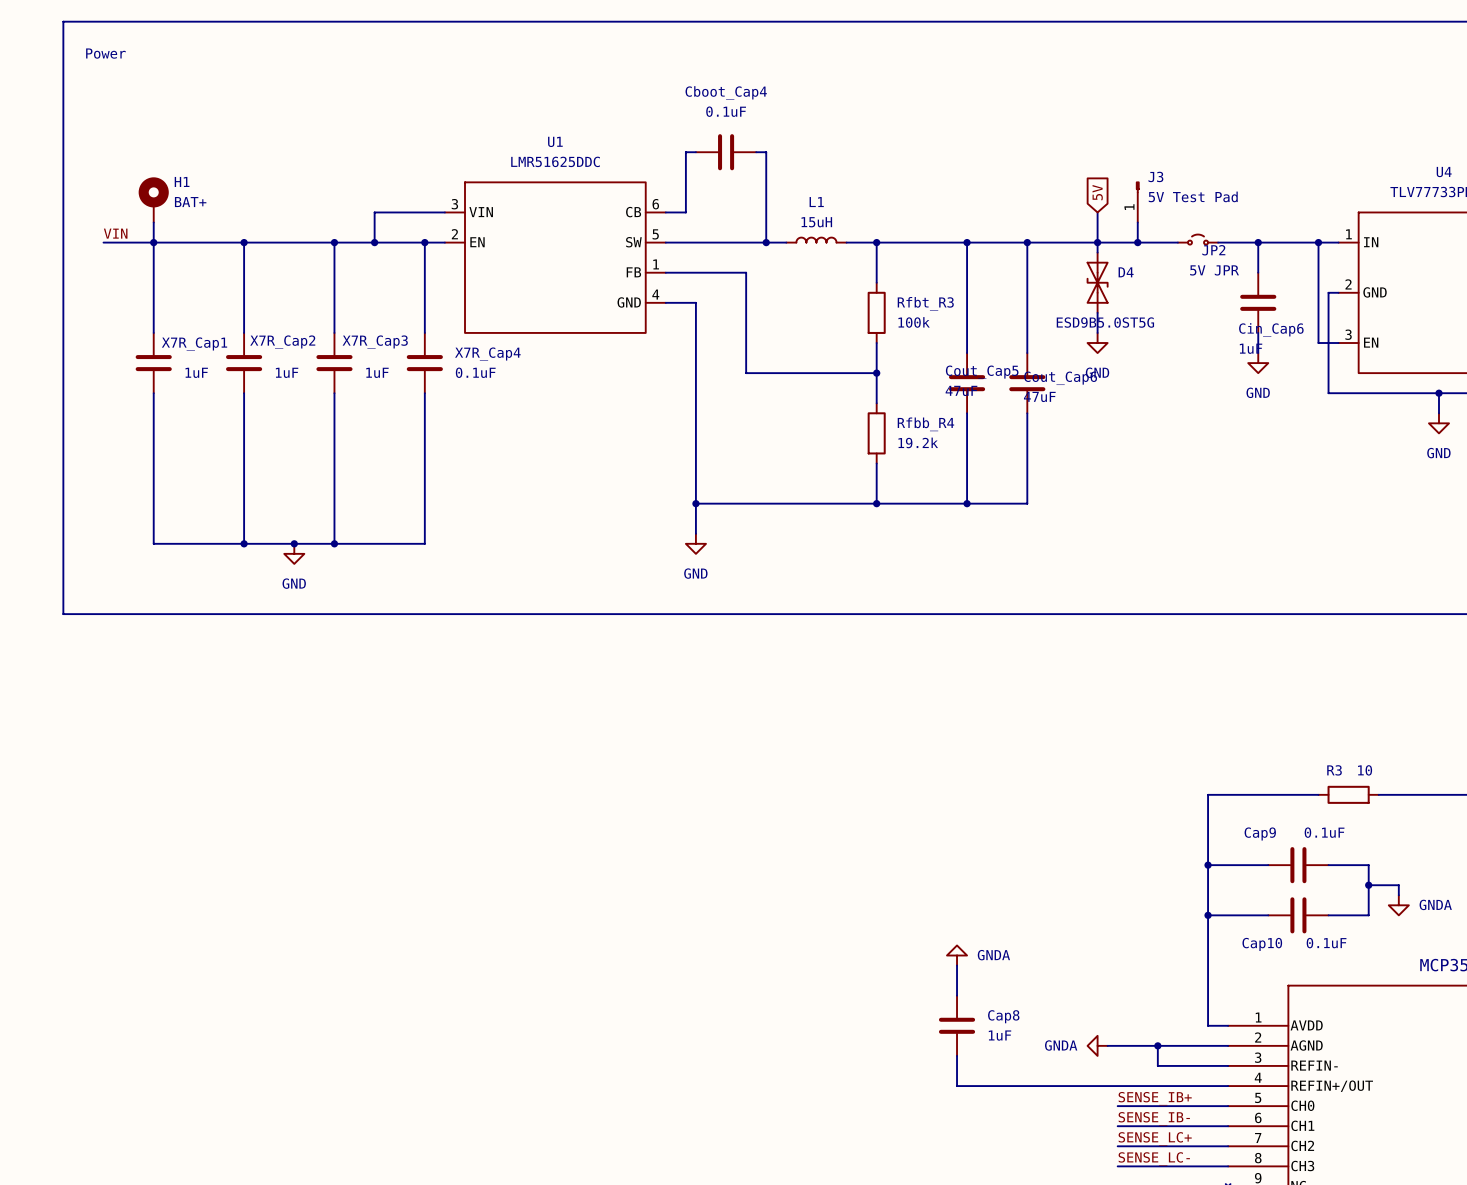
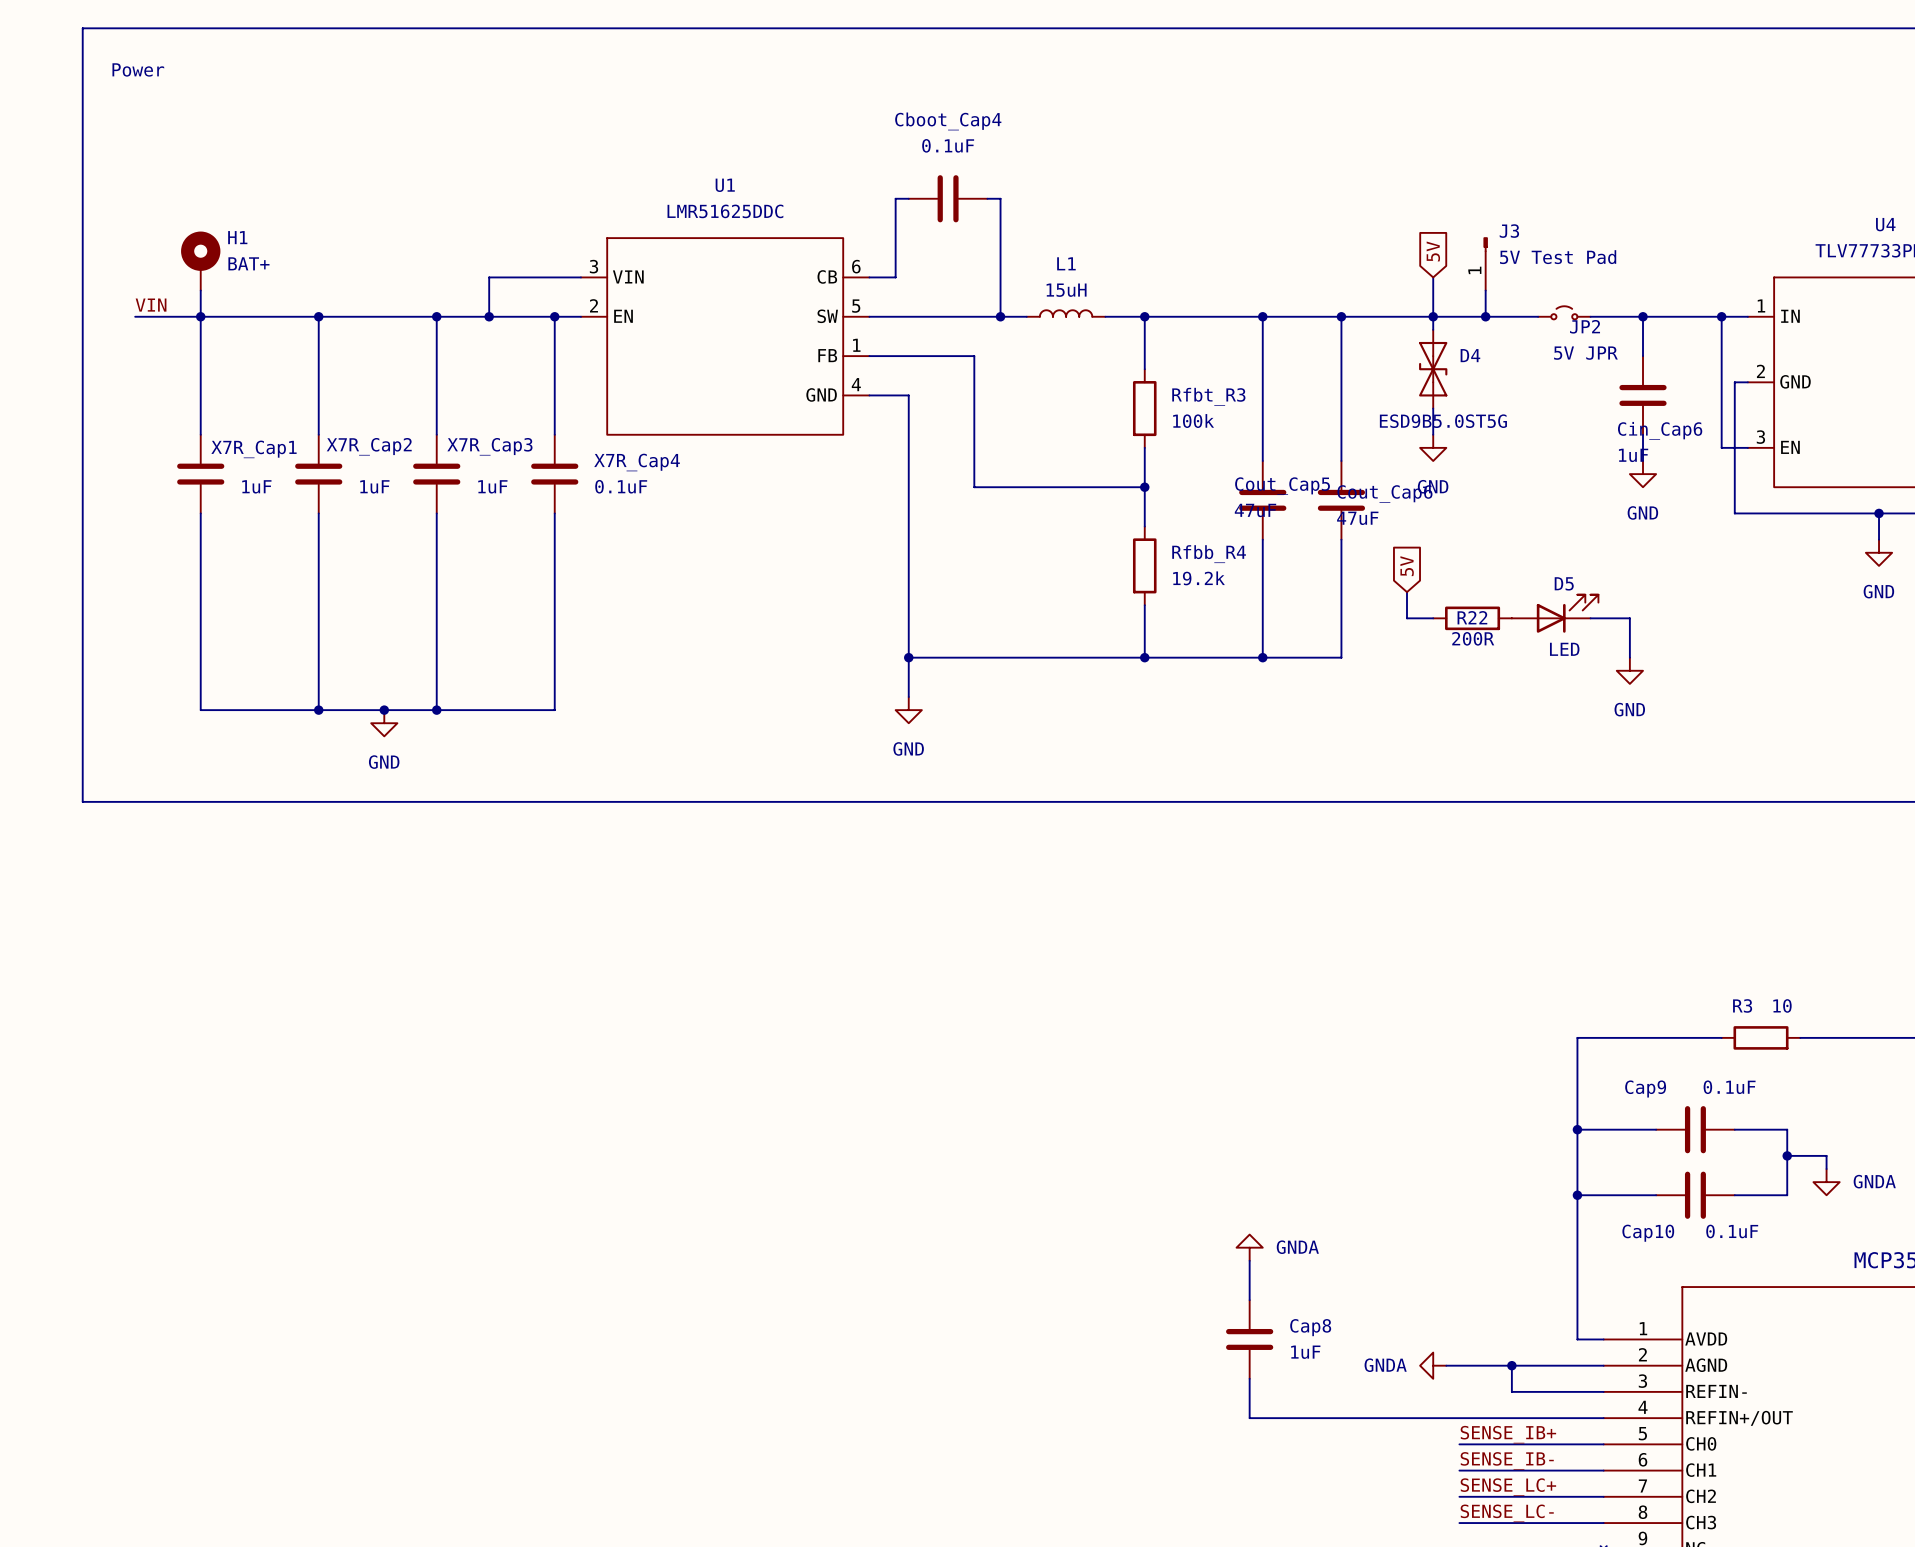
global label: none -> 5V (1407, 566)
wire: none -> (1406, 592) (1406, 618) (1433, 618)
D5: none -> LED (1555, 613)
R22: none -> 200R (1472, 618)
wire: none -> (1590, 618) (1629, 618) (1629, 657)
power symbol: none -> GND (1629, 670)

